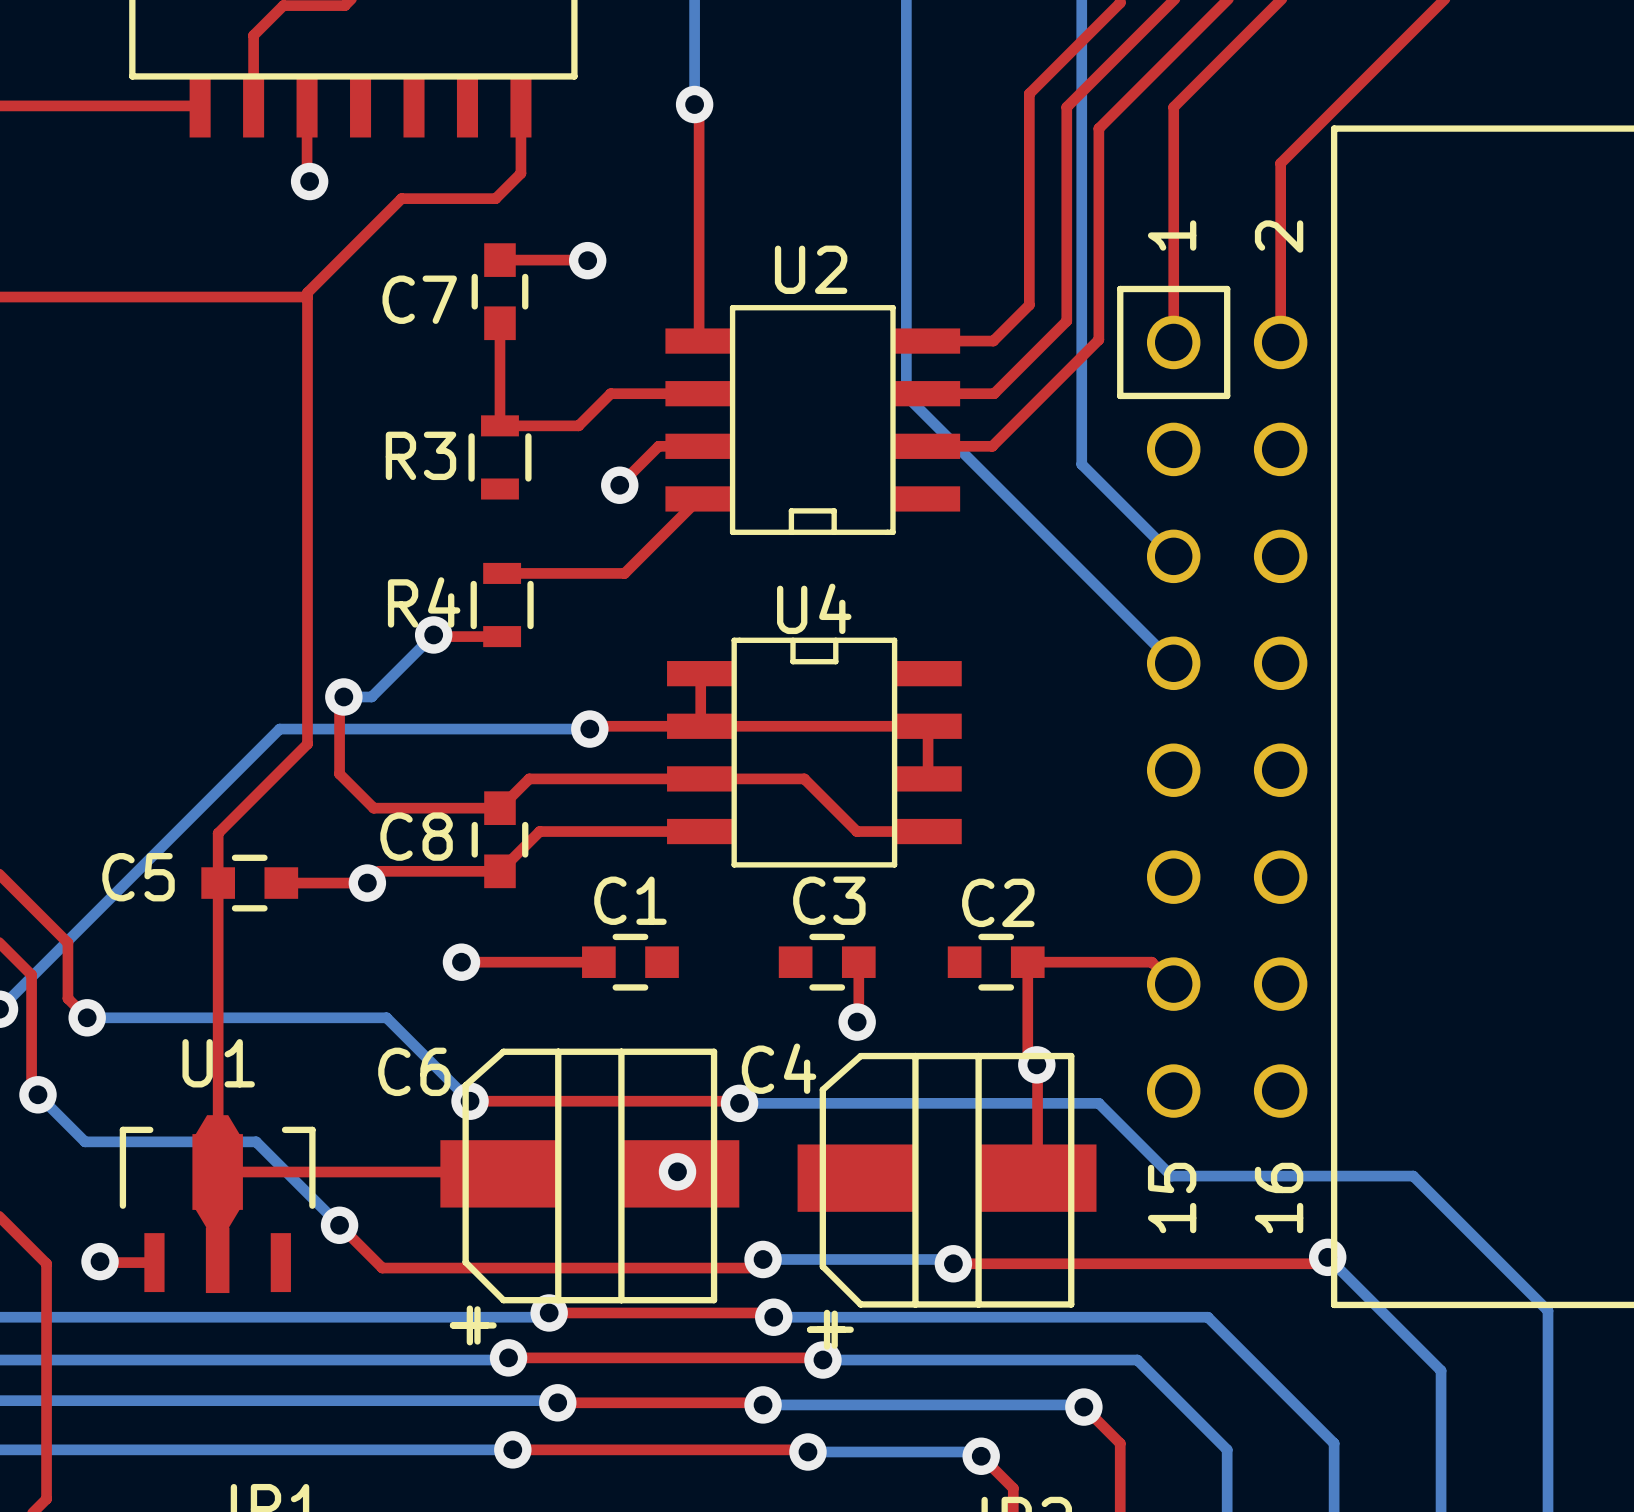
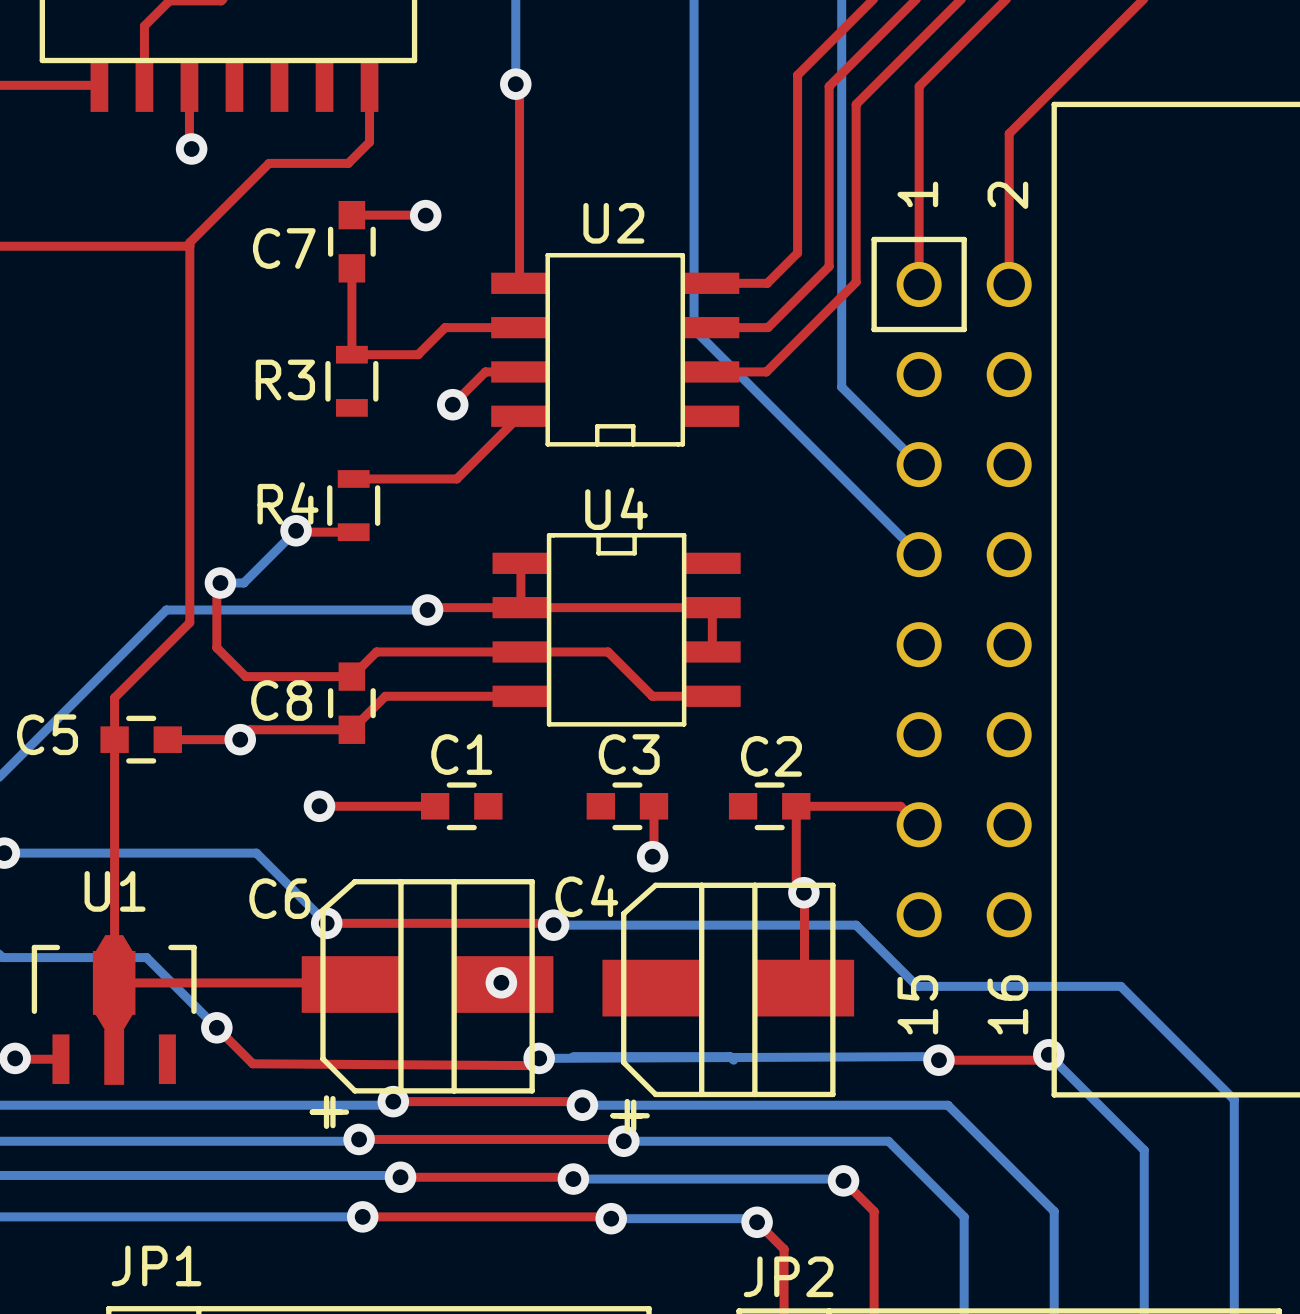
top track: (763, 1259) (754, 1268) (382, 1268) -> (539, 1058) (531, 1065) (252, 1063)
via position: (763, 1259) -> (539, 1058)
bottom track: none -> (539, 1058) (935, 1056) (938, 1060)
top track: (953, 1263) (1197, 1263) -> none
via: (953, 1263) -> none
via: none -> (938, 1060)

